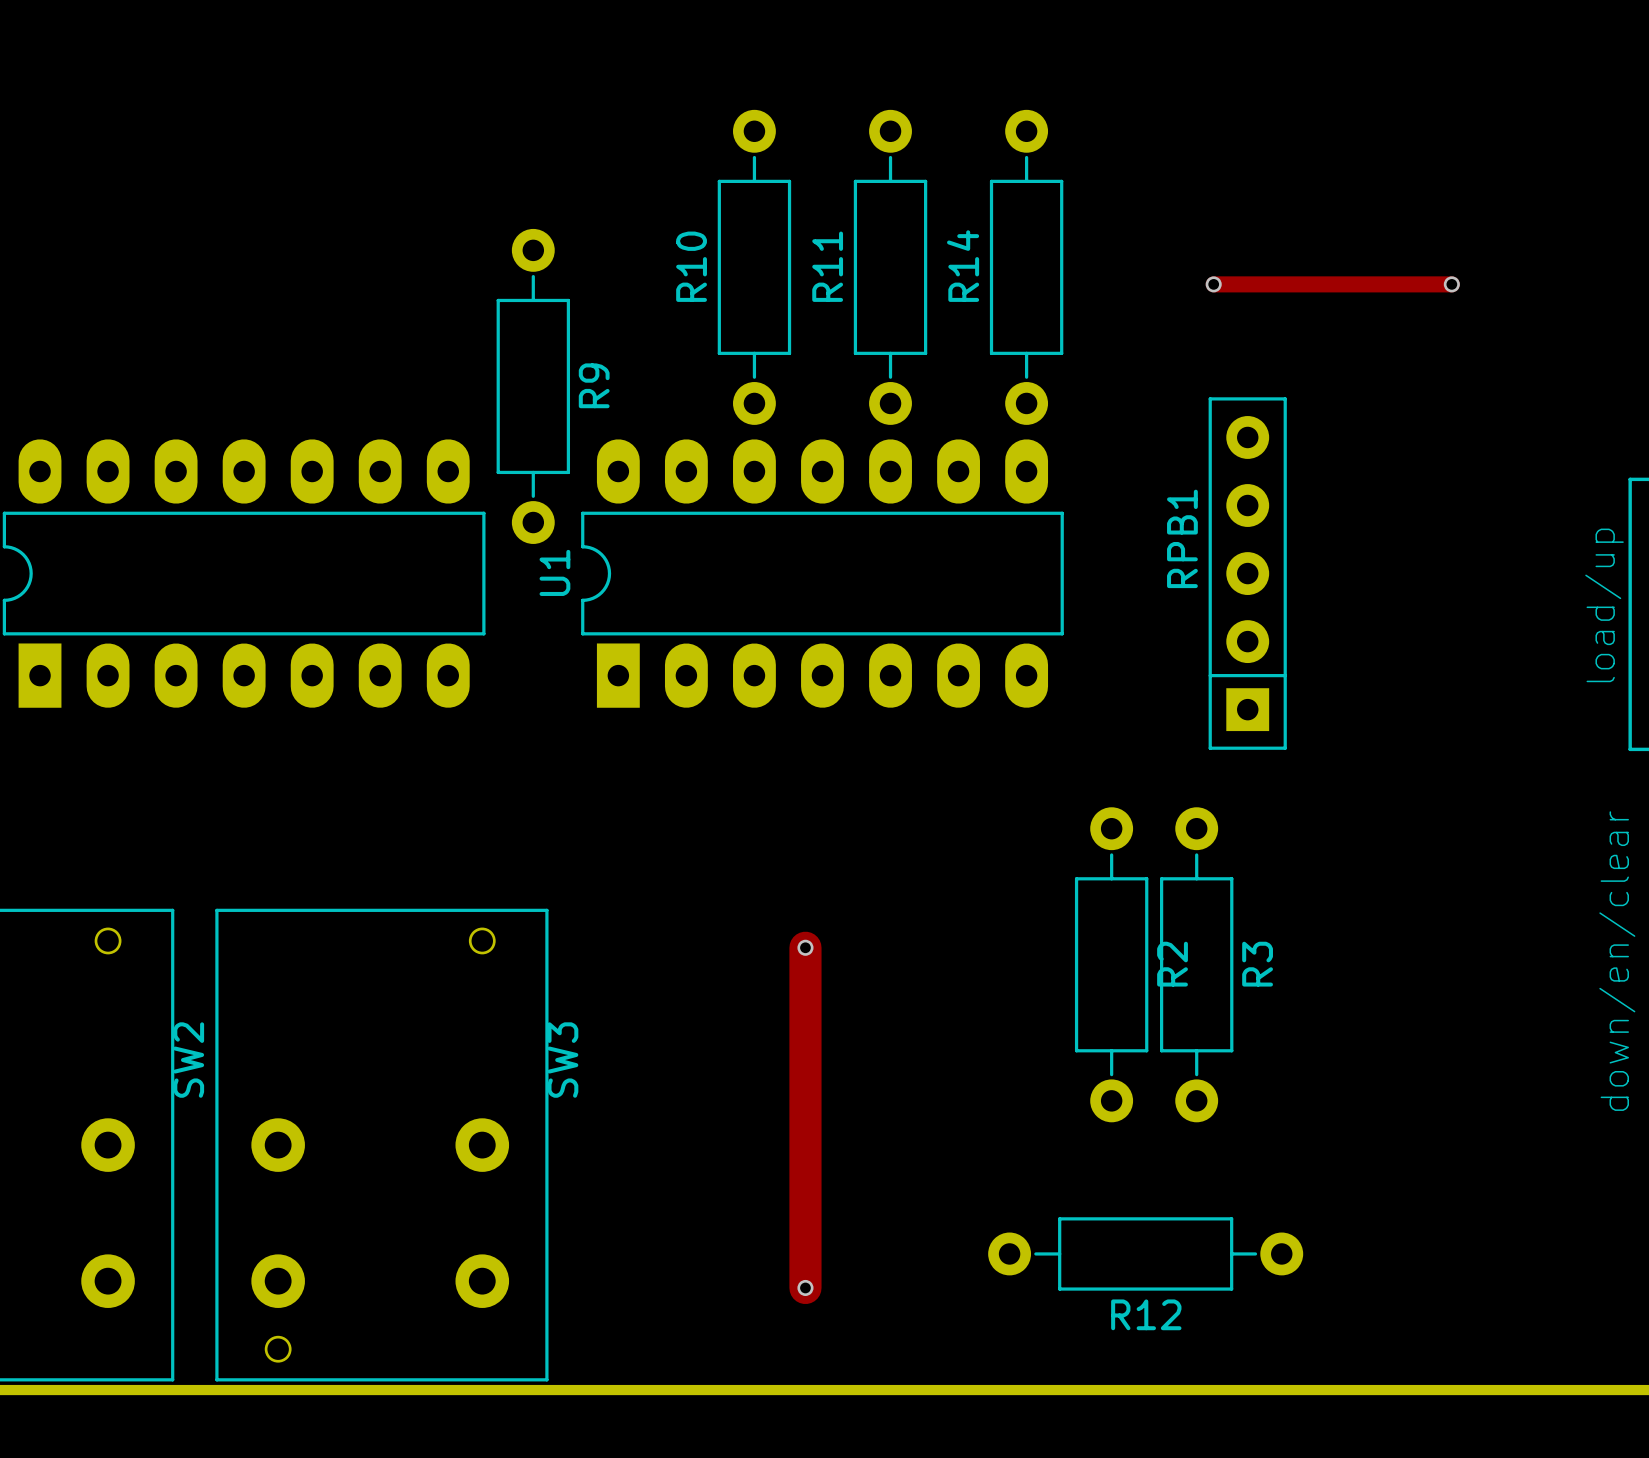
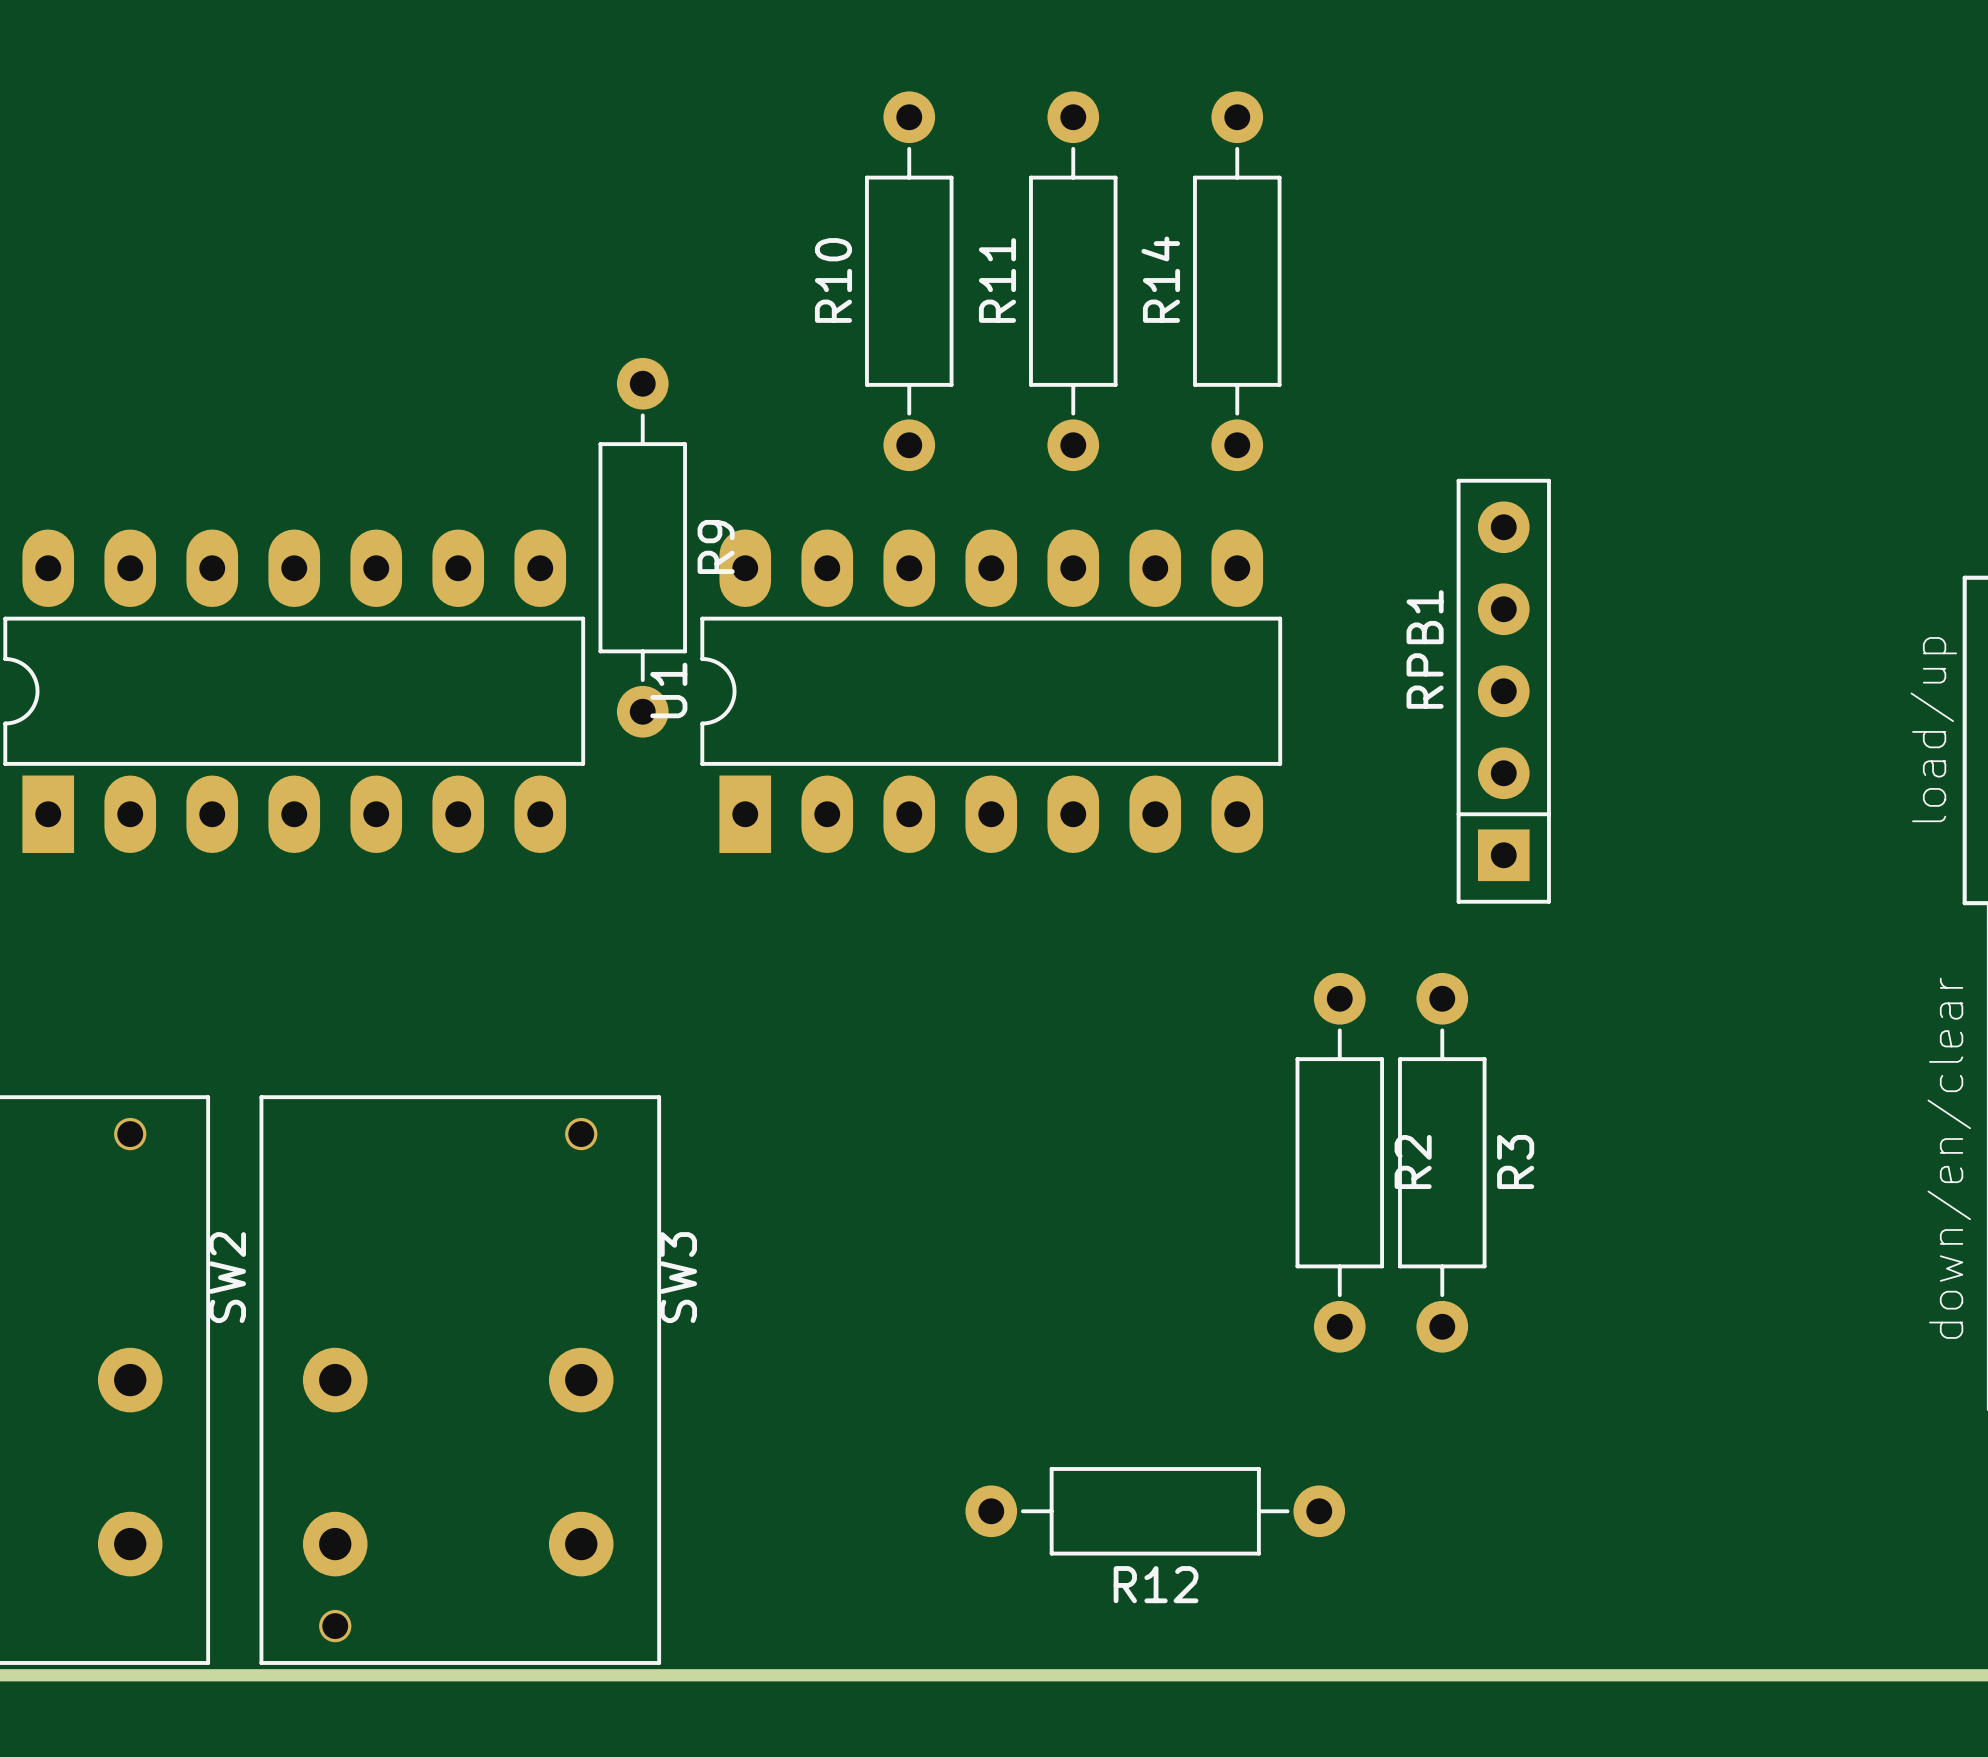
R10 position: (754, 267) -> (909, 281)
R11 position: (890, 267) -> (1073, 281)
R14 position: (1026, 267) -> (1237, 281)
track: (1213, 284) (1451, 284) -> none
via: (1213, 284) -> none
via: (1451, 284) -> none
R9 position: (533, 386) -> (642, 547)
track: (805, 947) (805, 1287) -> none
via: (805, 947) -> none
R12 position: (1145, 1253) -> (1155, 1511)
via: (805, 1287) -> none

